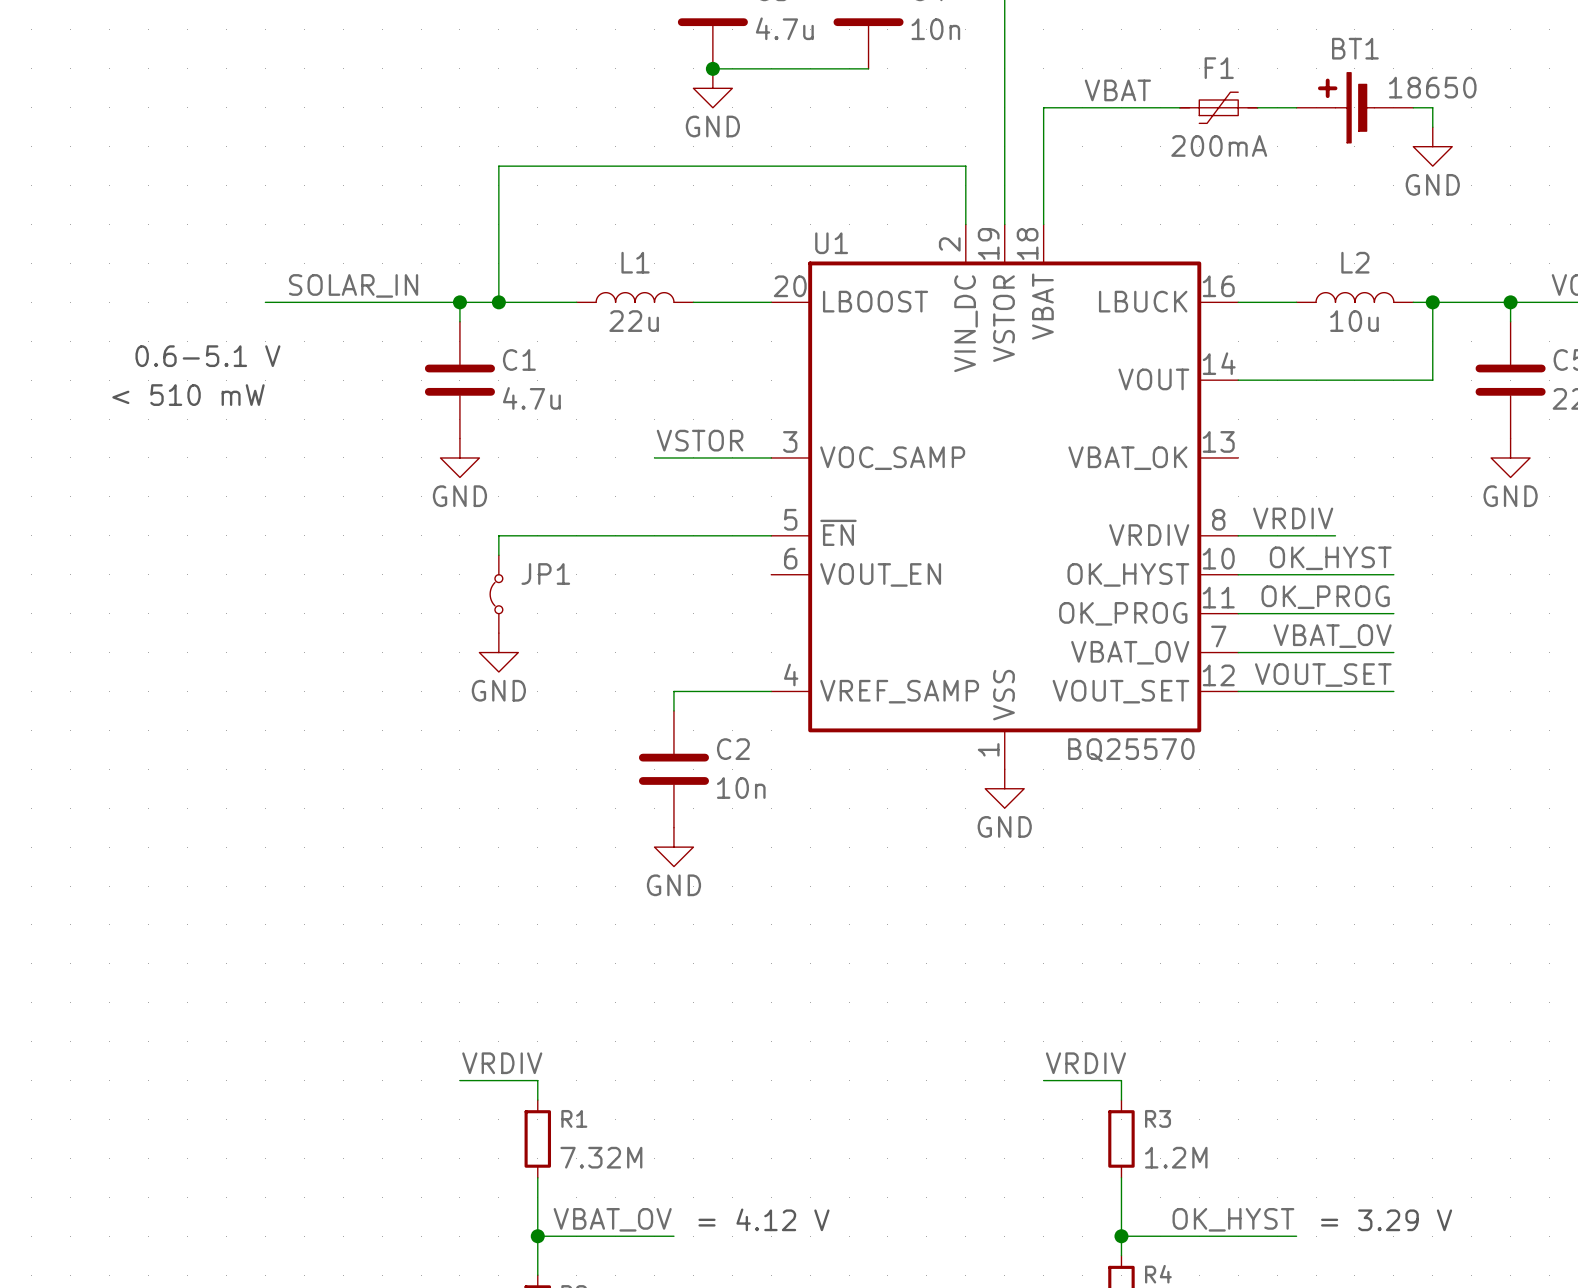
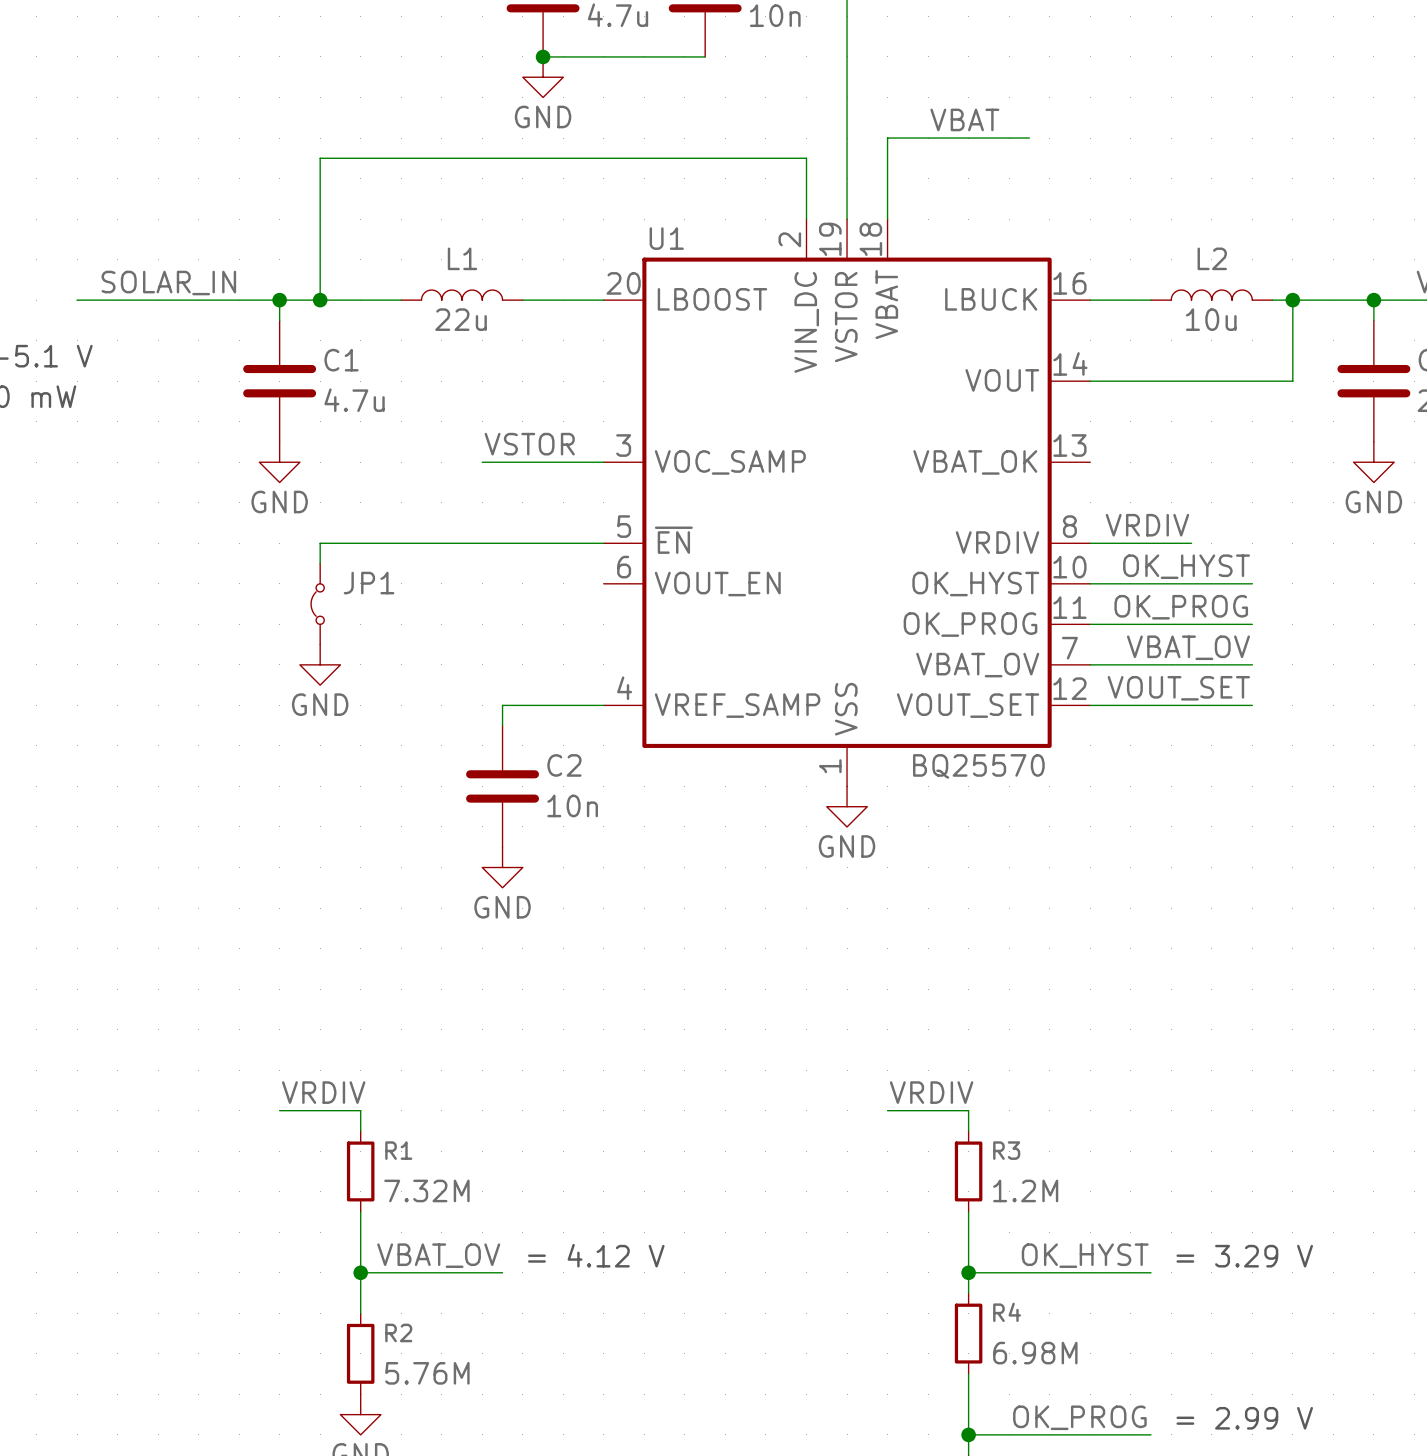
label position: VBAT (1117, 90) -> VBAT (964, 119)
wire: (1179, 107) (1043, 107) (1043, 146) -> (1029, 138) (887, 138)
F1: 200mA (1218, 107) -> none
wire: (1257, 107) (1296, 107) -> none
BT1: 18650 (1354, 107) -> none
wire: (1413, 107) (1432, 107) (1432, 127) -> none
power symbol: GND (1432, 146) -> none

